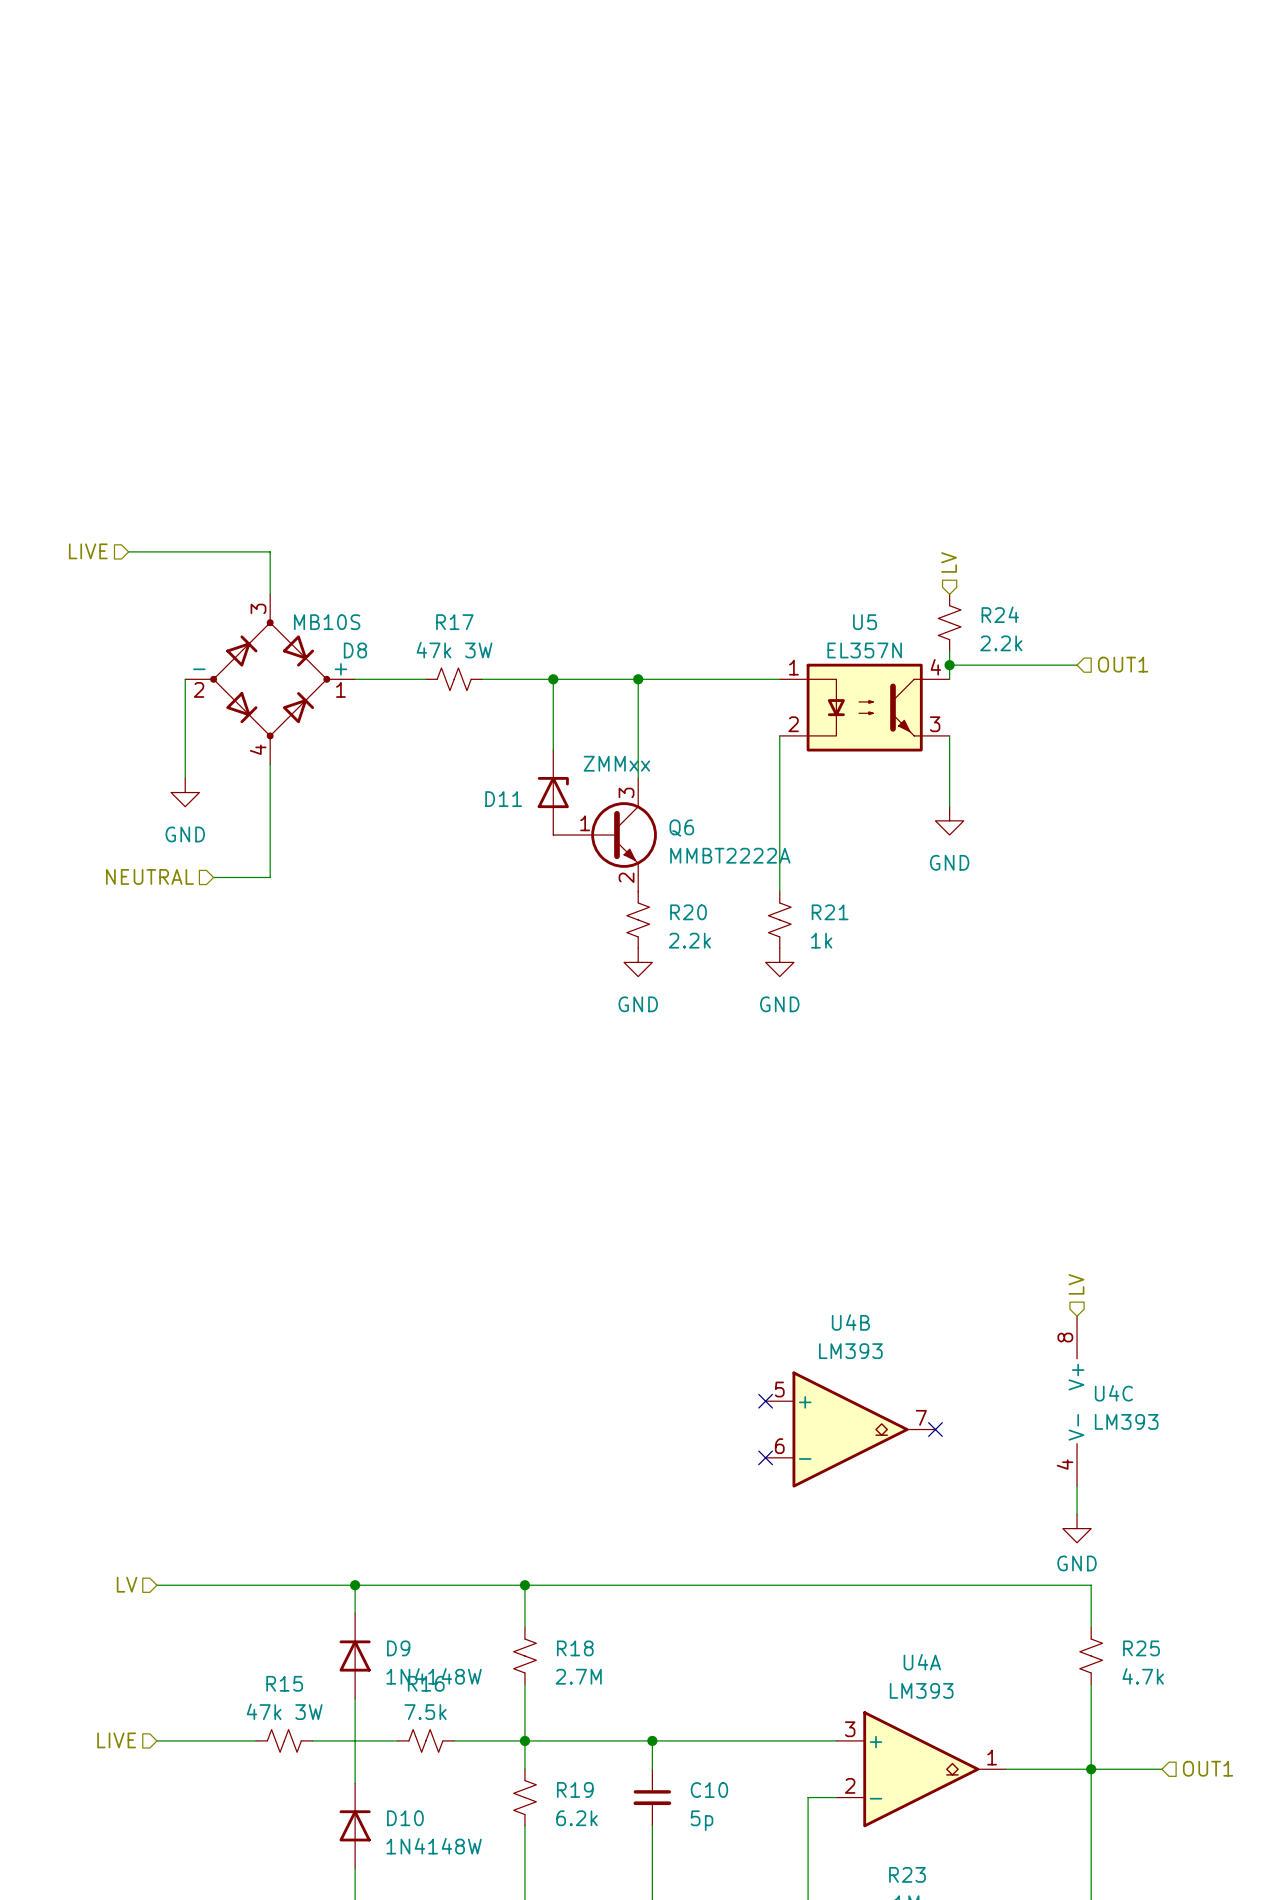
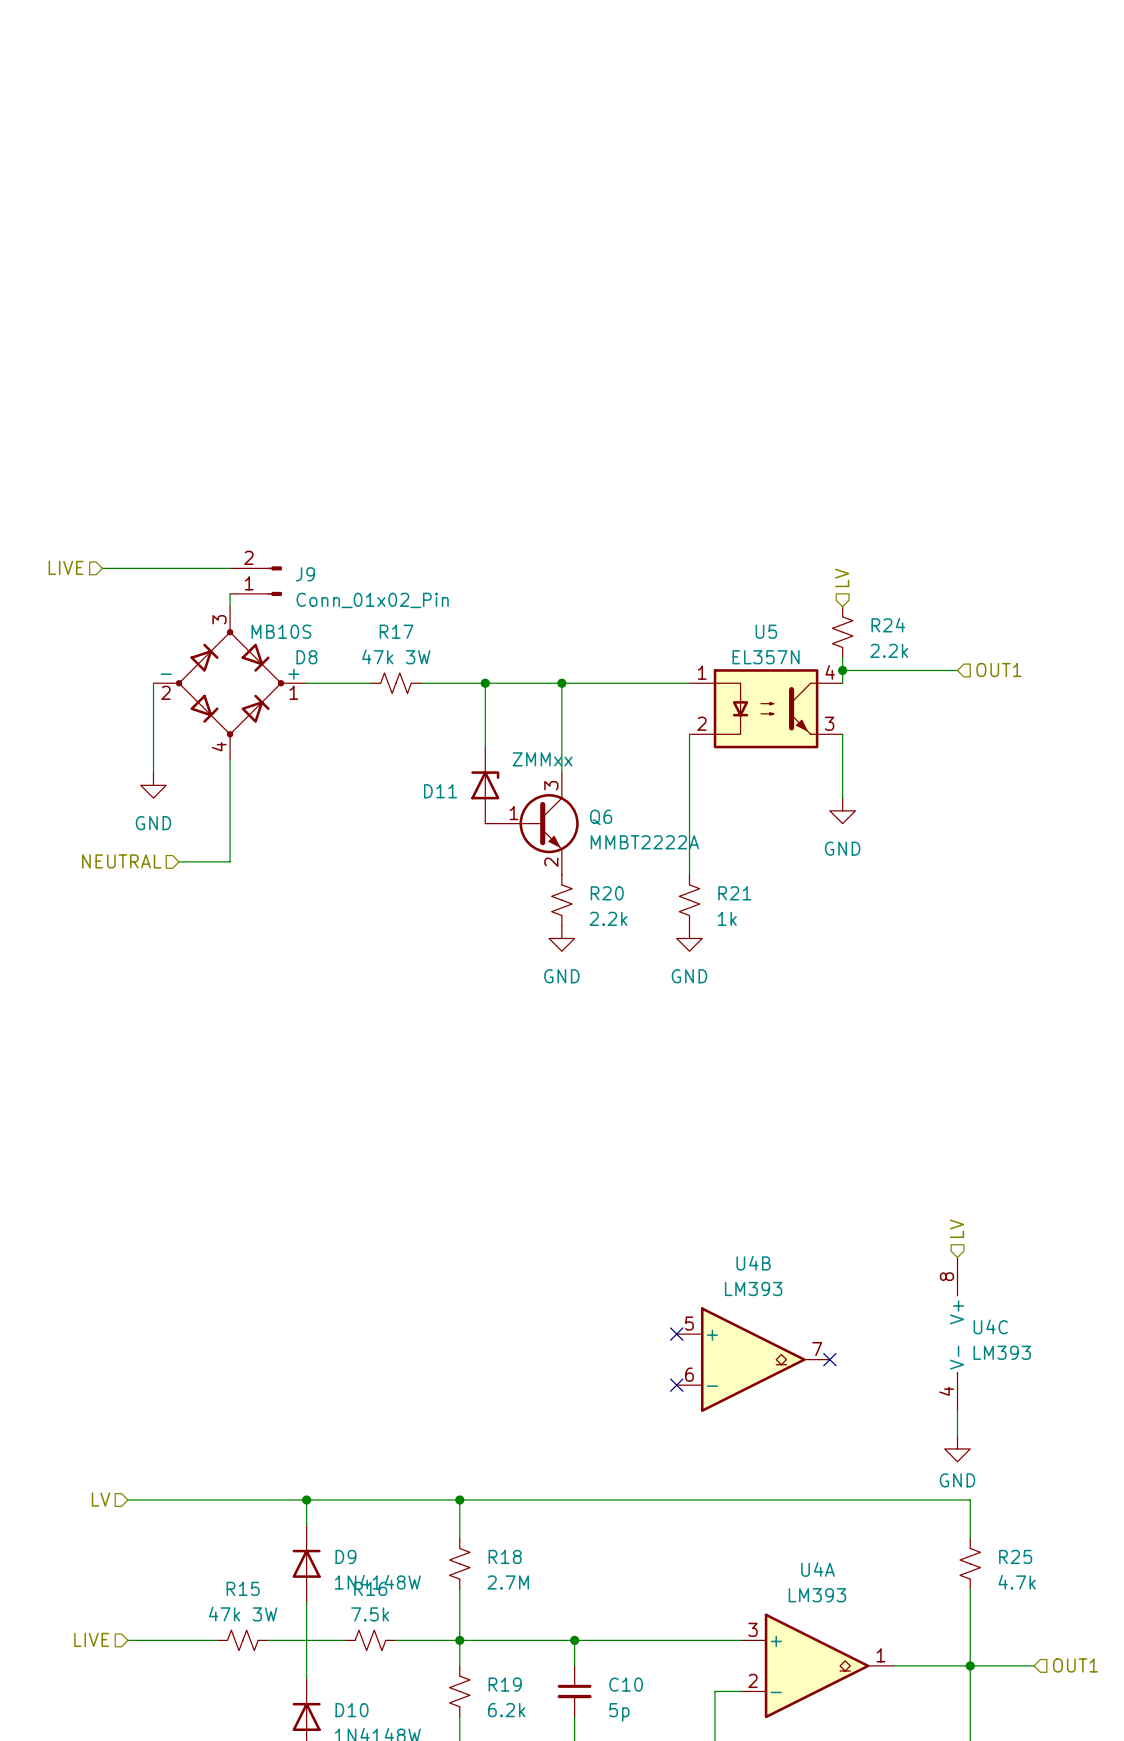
wire: (270, 551) (270, 580) -> none
J9: none -> Conn_01x02_Pin (255, 581)

